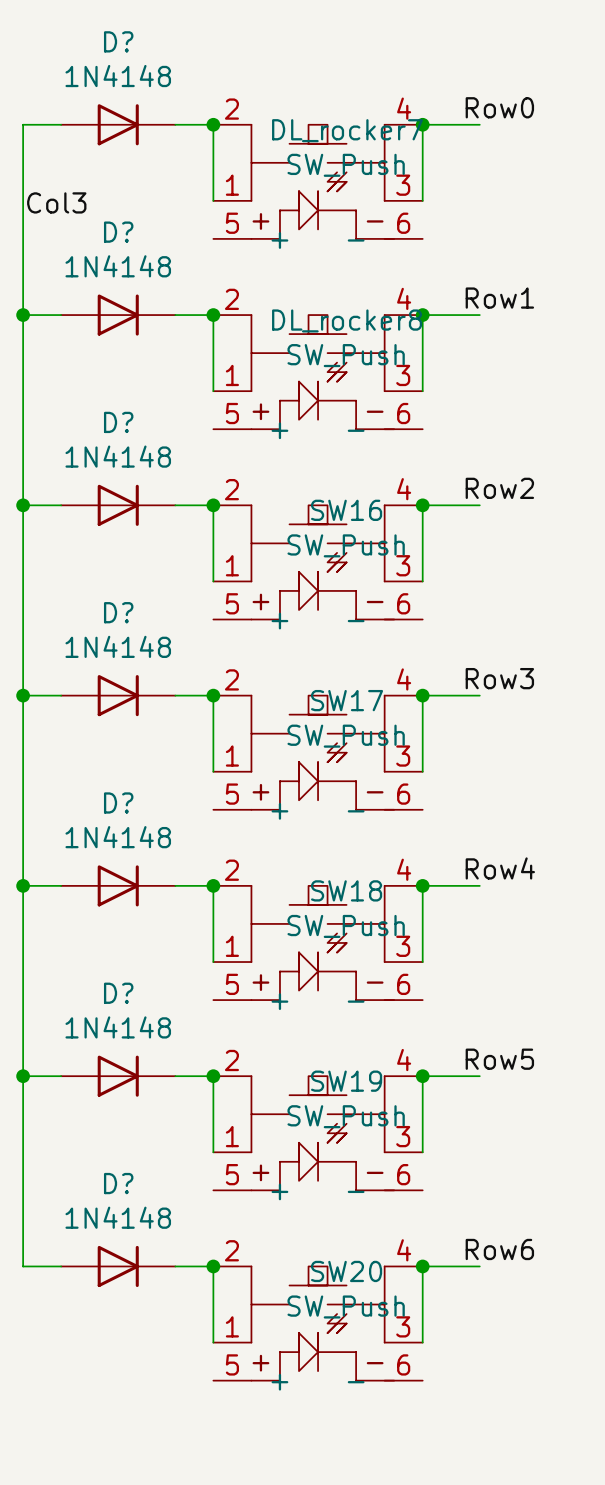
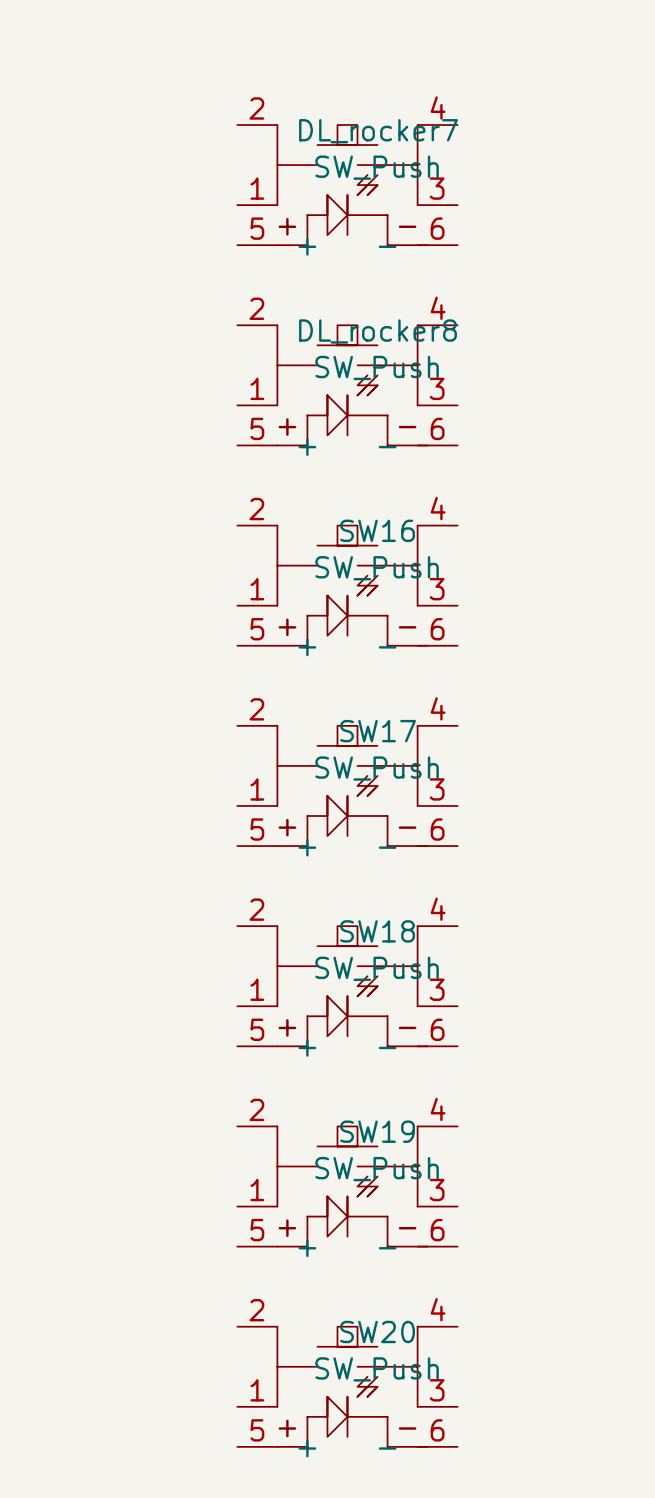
label: Row0 (499, 107) -> none
wire: (61, 124) (23, 124) (23, 1266) (61, 1266) -> none
D?: 1N4148 (118, 124) -> none
wire: (175, 124) (213, 124) (213, 200) -> none
junction: (213, 124) -> none
junction: (422, 124) -> none
wire: (479, 124) (422, 124) (422, 200) -> none
label: Col3 (56, 202) -> none
label: Row1 (499, 298) -> none
wire: (23, 315) (61, 315) -> none
junction: (23, 315) -> none
D?: 1N4148 (118, 315) -> none
wire: (175, 315) (213, 315) (213, 391) -> none
junction: (213, 315) -> none
junction: (422, 315) -> none
wire: (479, 315) (422, 315) (422, 391) -> none
label: Row2 (499, 488) -> none
wire: (23, 505) (61, 505) -> none
junction: (23, 505) -> none
D?: 1N4148 (118, 505) -> none
wire: (175, 505) (213, 505) (213, 581) -> none
junction: (213, 505) -> none
junction: (422, 505) -> none
wire: (479, 505) (422, 505) (422, 581) -> none
label: Row3 (499, 678) -> none
wire: (23, 695) (61, 695) -> none
junction: (23, 695) -> none
D?: 1N4148 (118, 695) -> none
wire: (175, 695) (213, 695) (213, 771) -> none
junction: (213, 695) -> none
junction: (422, 695) -> none
wire: (479, 695) (422, 695) (422, 771) -> none
label: Row4 (500, 868) -> none
wire: (23, 885) (61, 885) -> none
junction: (23, 885) -> none
D?: 1N4148 (118, 885) -> none
wire: (175, 885) (213, 885) (213, 962) -> none
junction: (213, 885) -> none
junction: (422, 885) -> none
wire: (479, 885) (422, 885) (422, 962) -> none
label: Row5 (499, 1059) -> none
wire: (23, 1076) (61, 1076) -> none
junction: (23, 1076) -> none
D?: 1N4148 (118, 1076) -> none
wire: (175, 1076) (213, 1076) (213, 1152) -> none
junction: (213, 1076) -> none
junction: (422, 1076) -> none
wire: (479, 1076) (422, 1076) (422, 1152) -> none
label: Row6 (499, 1249) -> none
D?: 1N4148 (118, 1266) -> none
wire: (175, 1266) (213, 1266) (213, 1342) -> none
junction: (213, 1266) -> none
junction: (422, 1266) -> none
wire: (479, 1266) (422, 1266) (422, 1342) -> none

